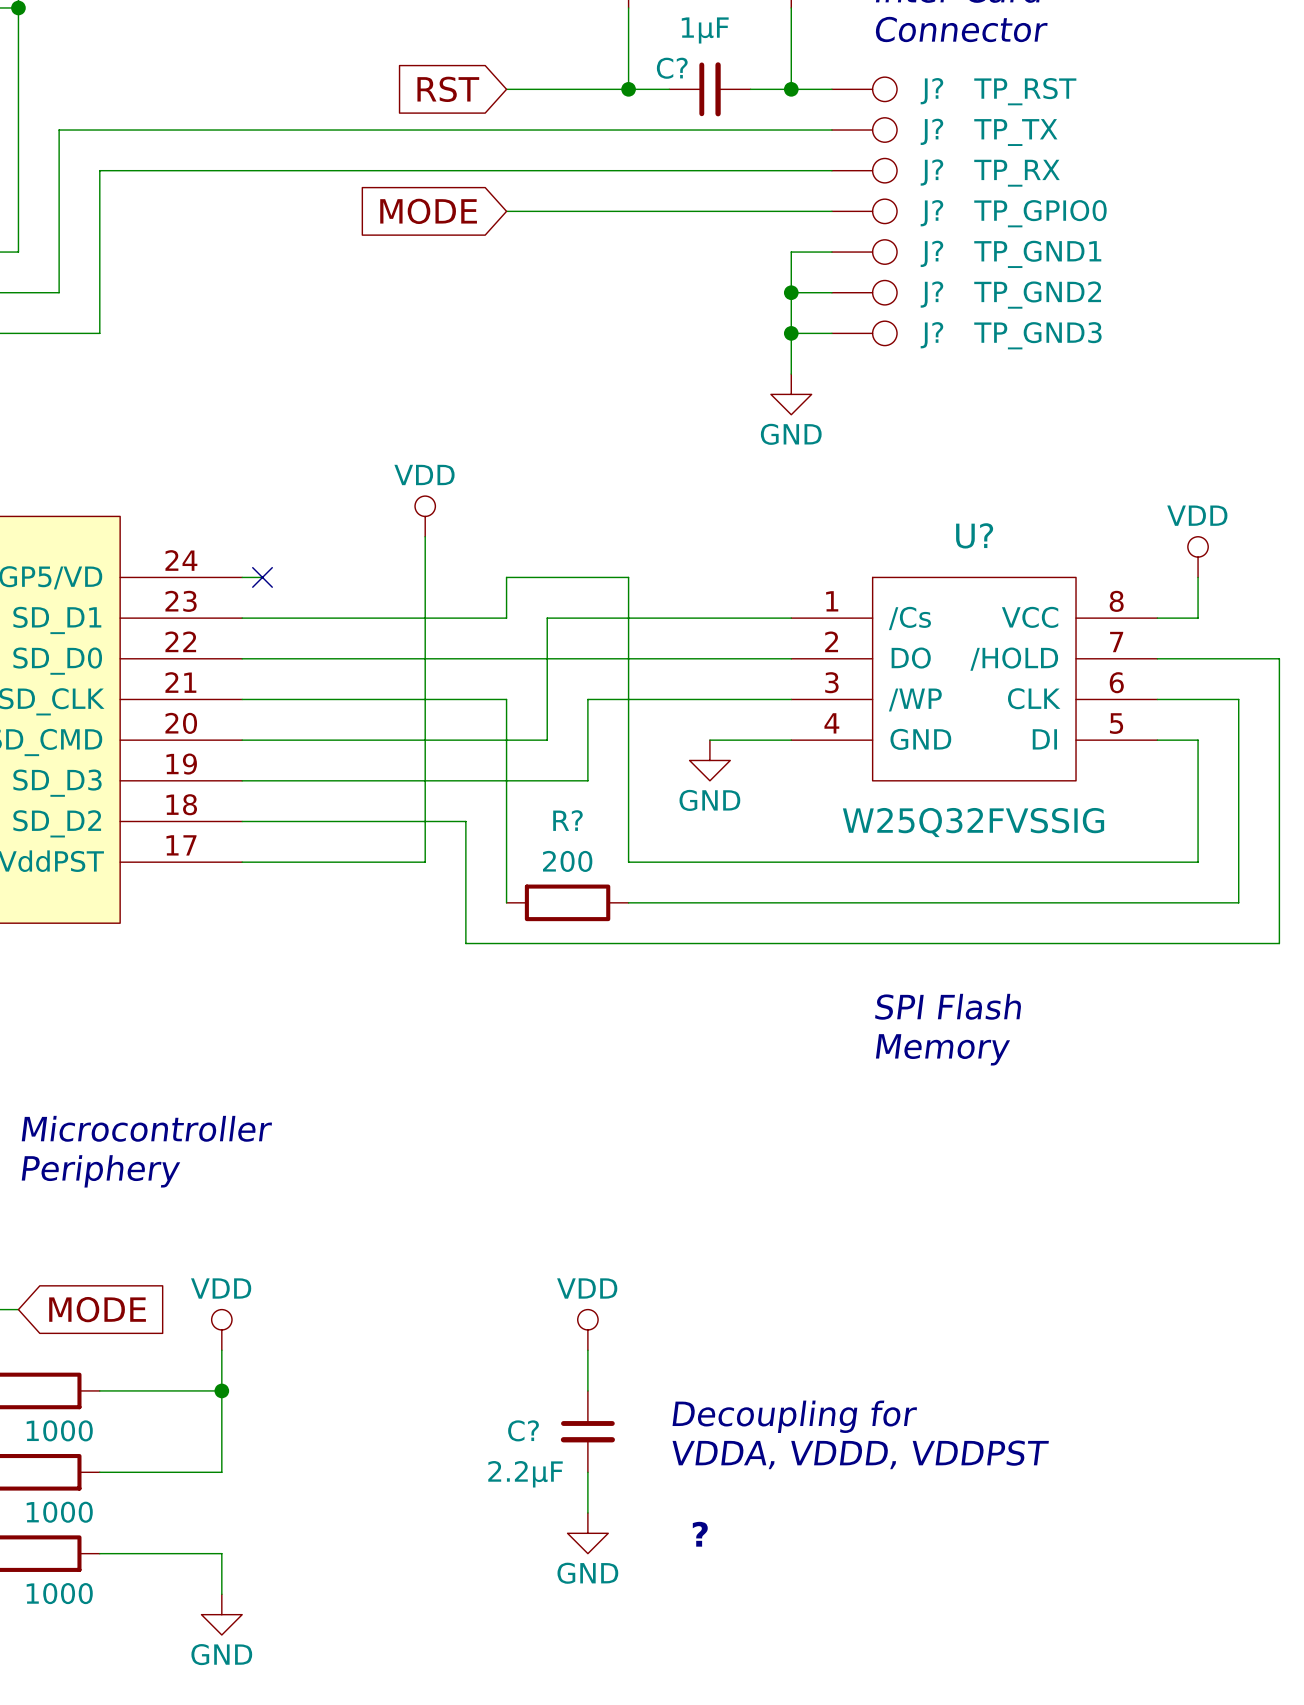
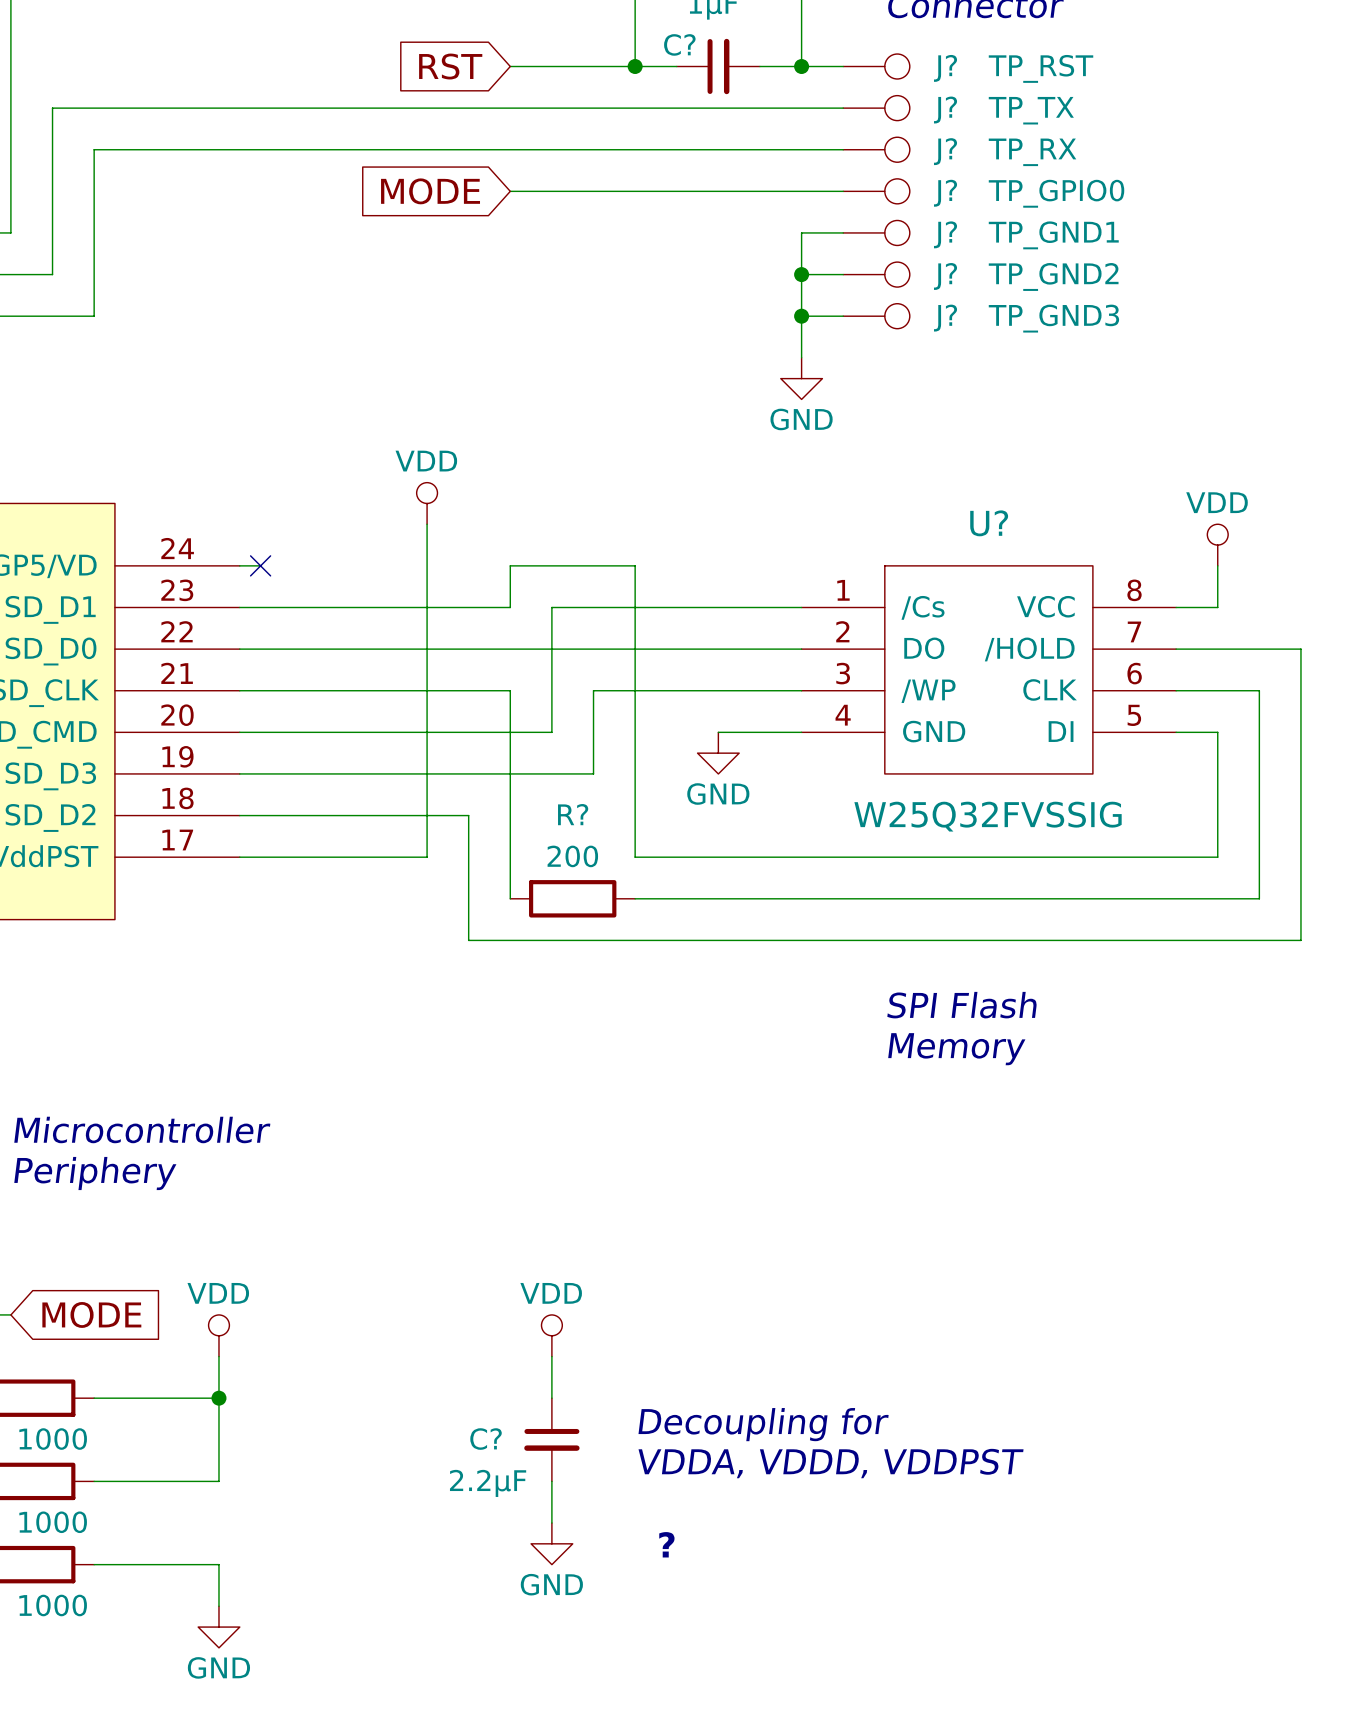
power symbol position: VDD (587, 1329) -> VDD (551, 1335)
wire: (587, 1350) (587, 1390) -> (551, 1356) (551, 1398)
text position: Decoupling for (794, 1416) -> Decoupling for (763, 1424)
C? position: (587, 1431) -> (551, 1439)
text position: VDDA, VDDD, VDDPST (860, 1454) -> VDDA, VDDD, VDDPST (831, 1463)
wire: (587, 1472) (587, 1512) -> (551, 1481) (551, 1523)
power symbol position: GND (587, 1533) -> GND (551, 1543)
text position: ? (700, 1534) -> ? (666, 1544)

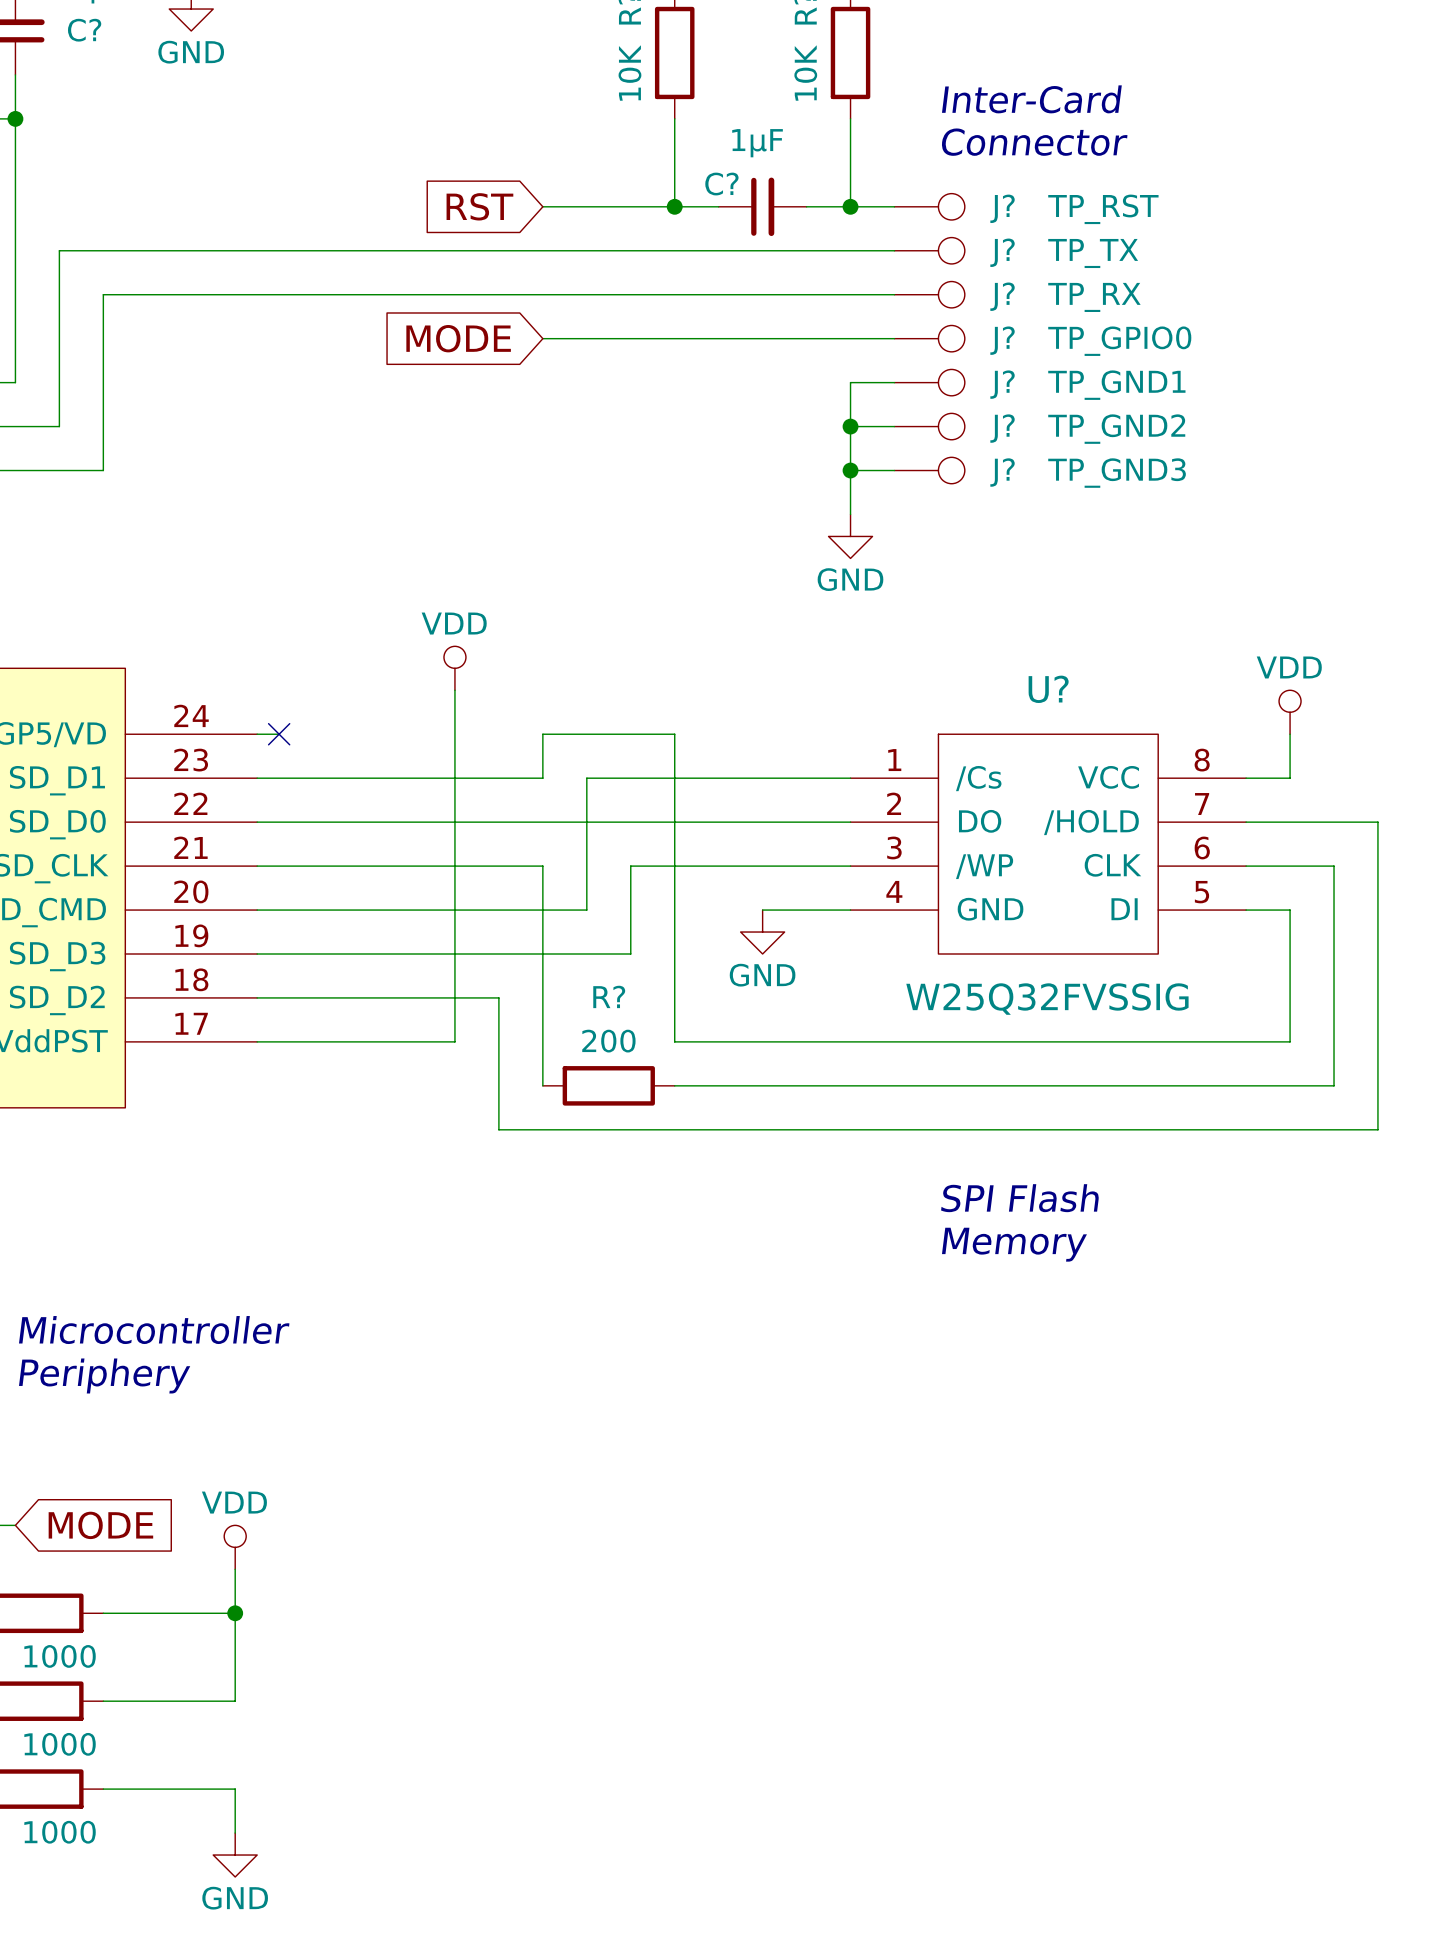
power symbol: VDD (551, 1335) -> none
wire: (551, 1356) (551, 1398) -> none
text: Decoupling for (763, 1424) -> none
C?: 2.2μF (551, 1439) -> none
text: VDDA, VDDD, VDDPST (831, 1463) -> none
wire: (551, 1481) (551, 1523) -> none
power symbol: GND (551, 1543) -> none
text: ? (666, 1544) -> none

